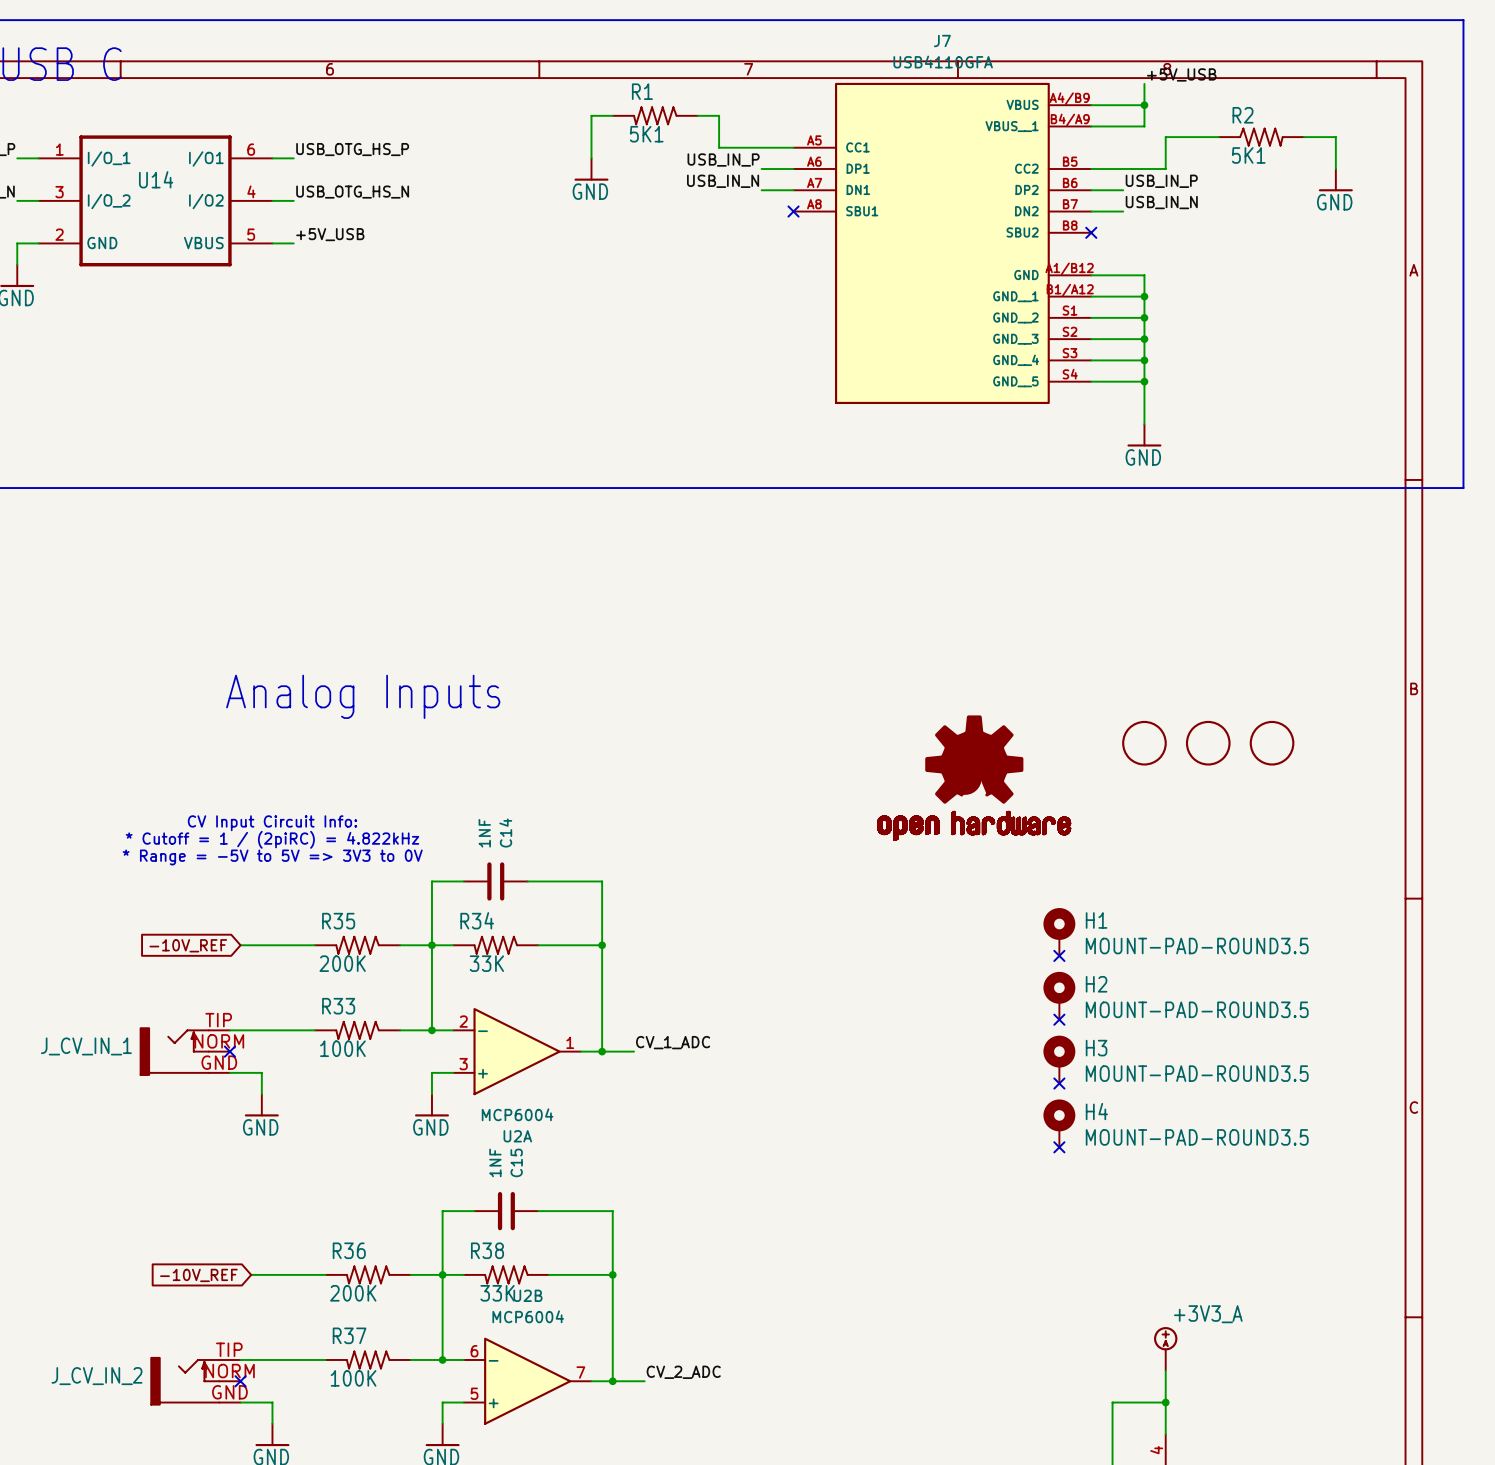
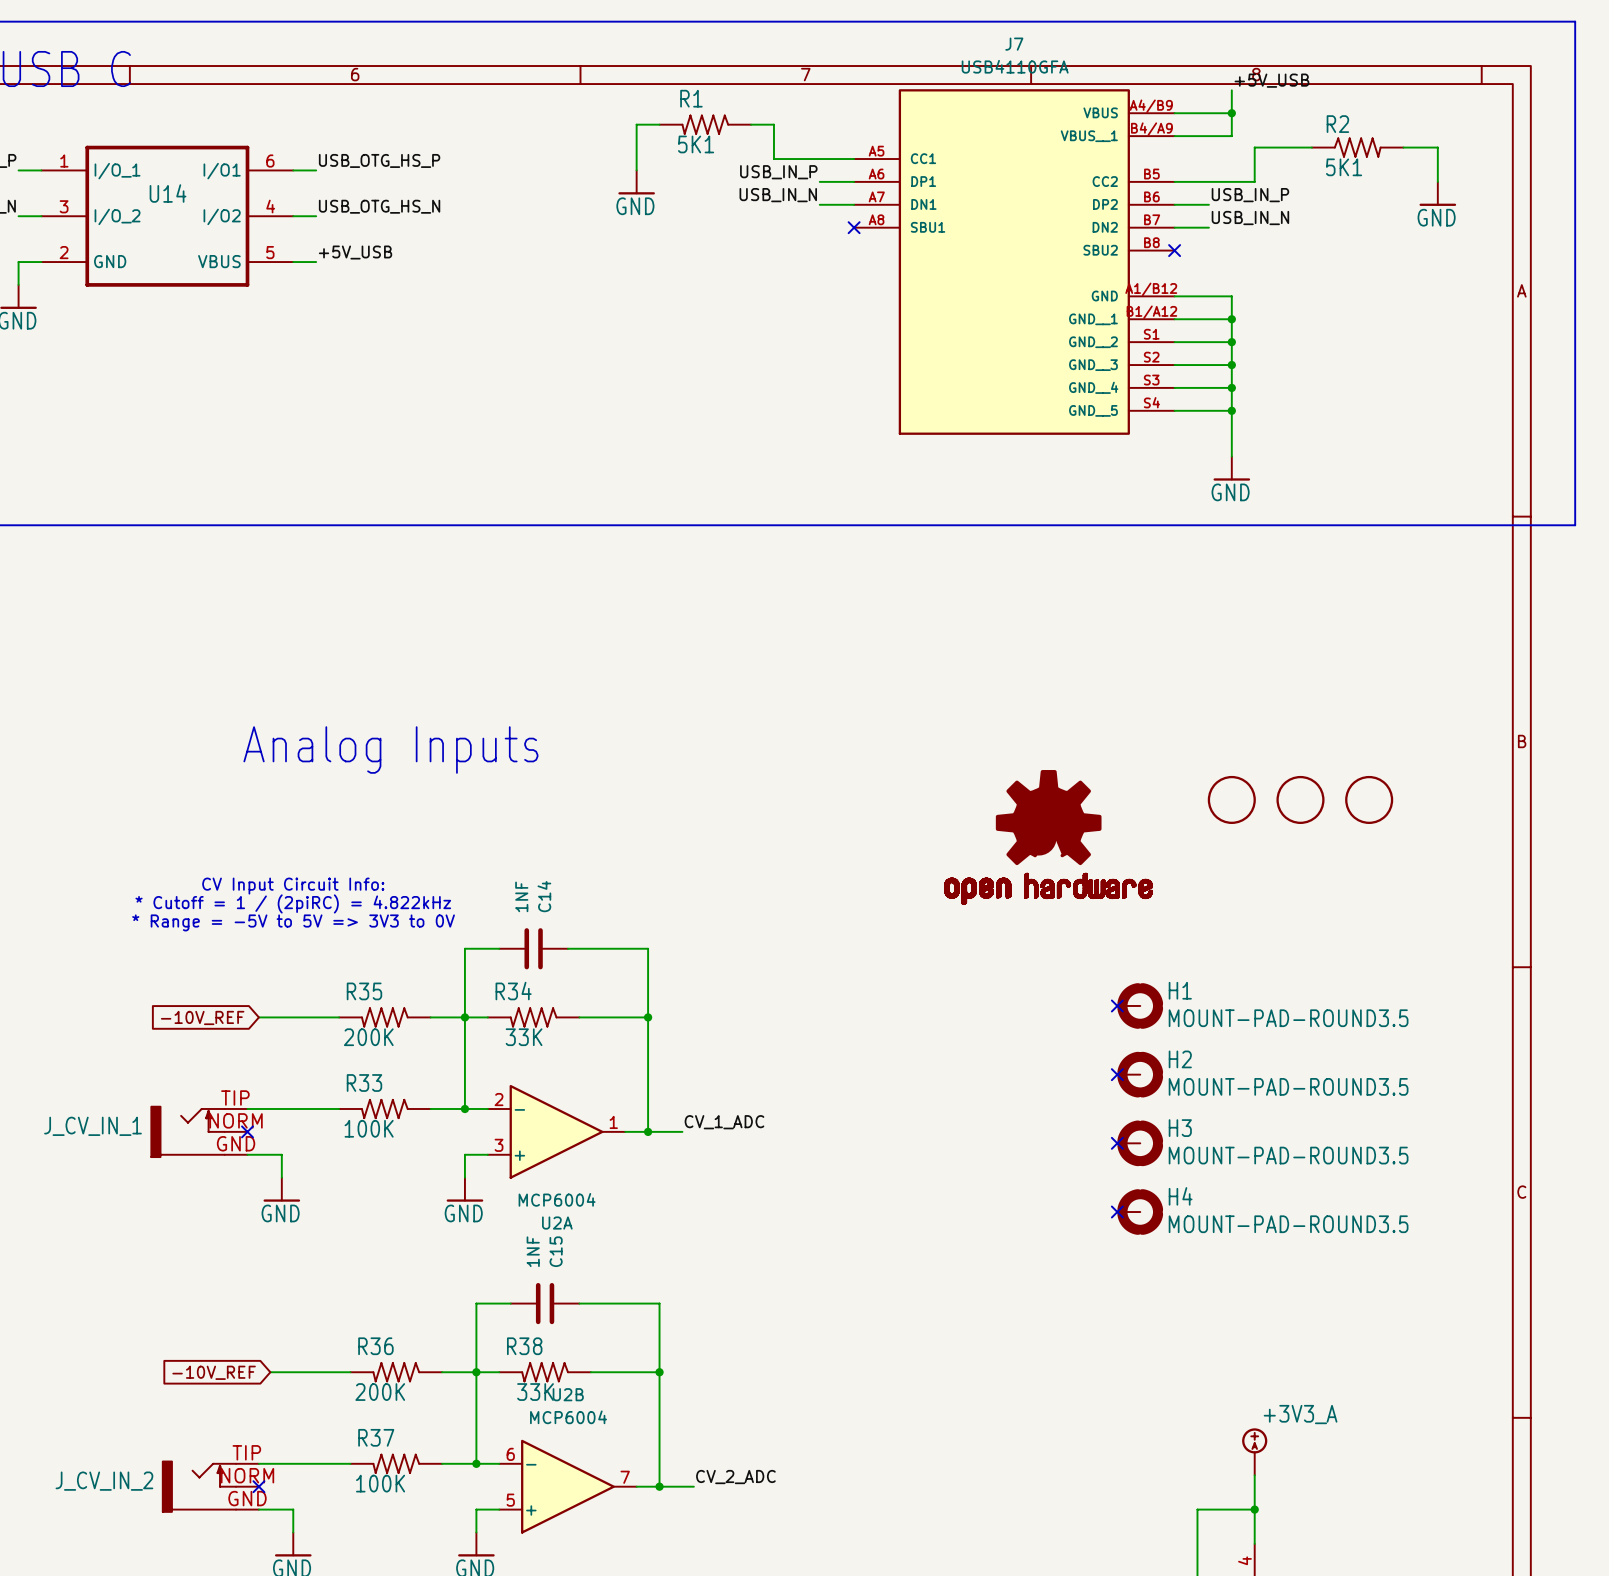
H1 symbol: [1043, 908, 1076, 956] -> [1117, 983, 1164, 1029]
no-connect mark: none -> (1117, 1005)
no-connect mark: (1059, 955) -> none
H2 symbol: [1043, 971, 1076, 1020] -> [1117, 1051, 1164, 1098]
no-connect mark: none -> (1117, 1074)
no-connect mark: (1059, 1019) -> none
H3 symbol: [1043, 1035, 1076, 1084] -> [1117, 1120, 1164, 1167]
no-connect mark: none -> (1117, 1143)
no-connect mark: (1059, 1083) -> none
H4 symbol: [1043, 1099, 1076, 1148] -> [1117, 1189, 1164, 1235]
no-connect mark: none -> (1117, 1212)
no-connect mark: (1059, 1147) -> none

